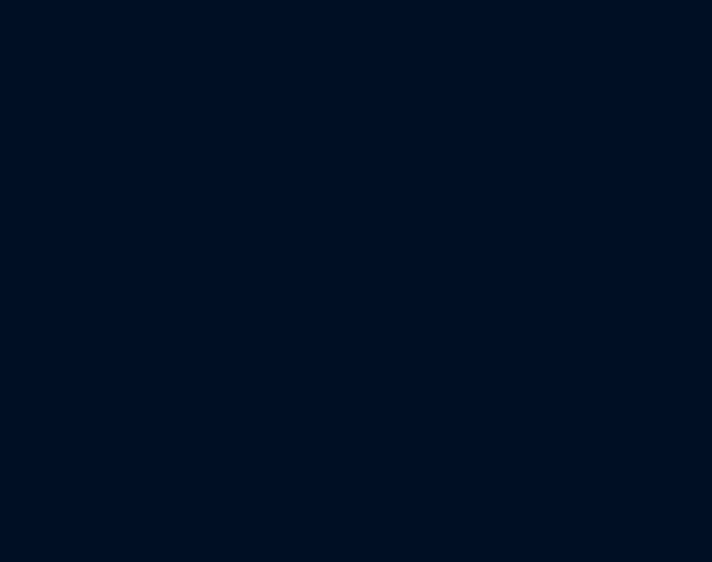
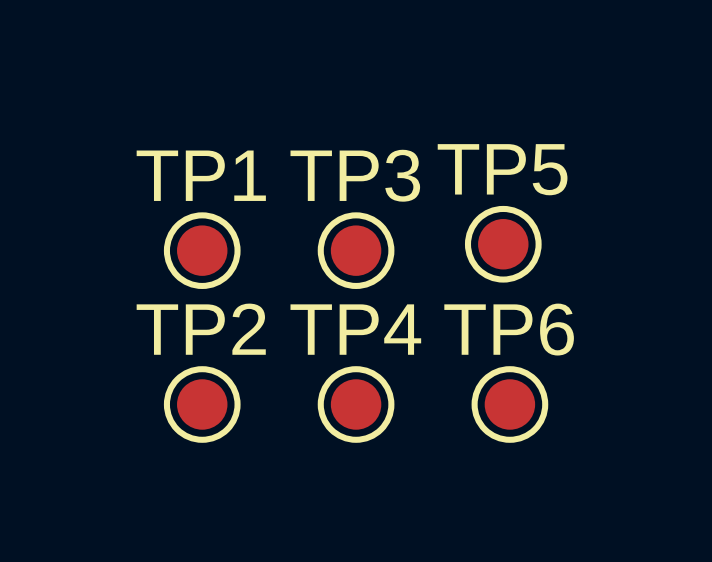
TP5: none -> (503, 244)
TP1: none -> (202, 250)
TP3: none -> (356, 250)
TP2: none -> (202, 404)
TP4: none -> (356, 404)
TP6: none -> (509, 404)

